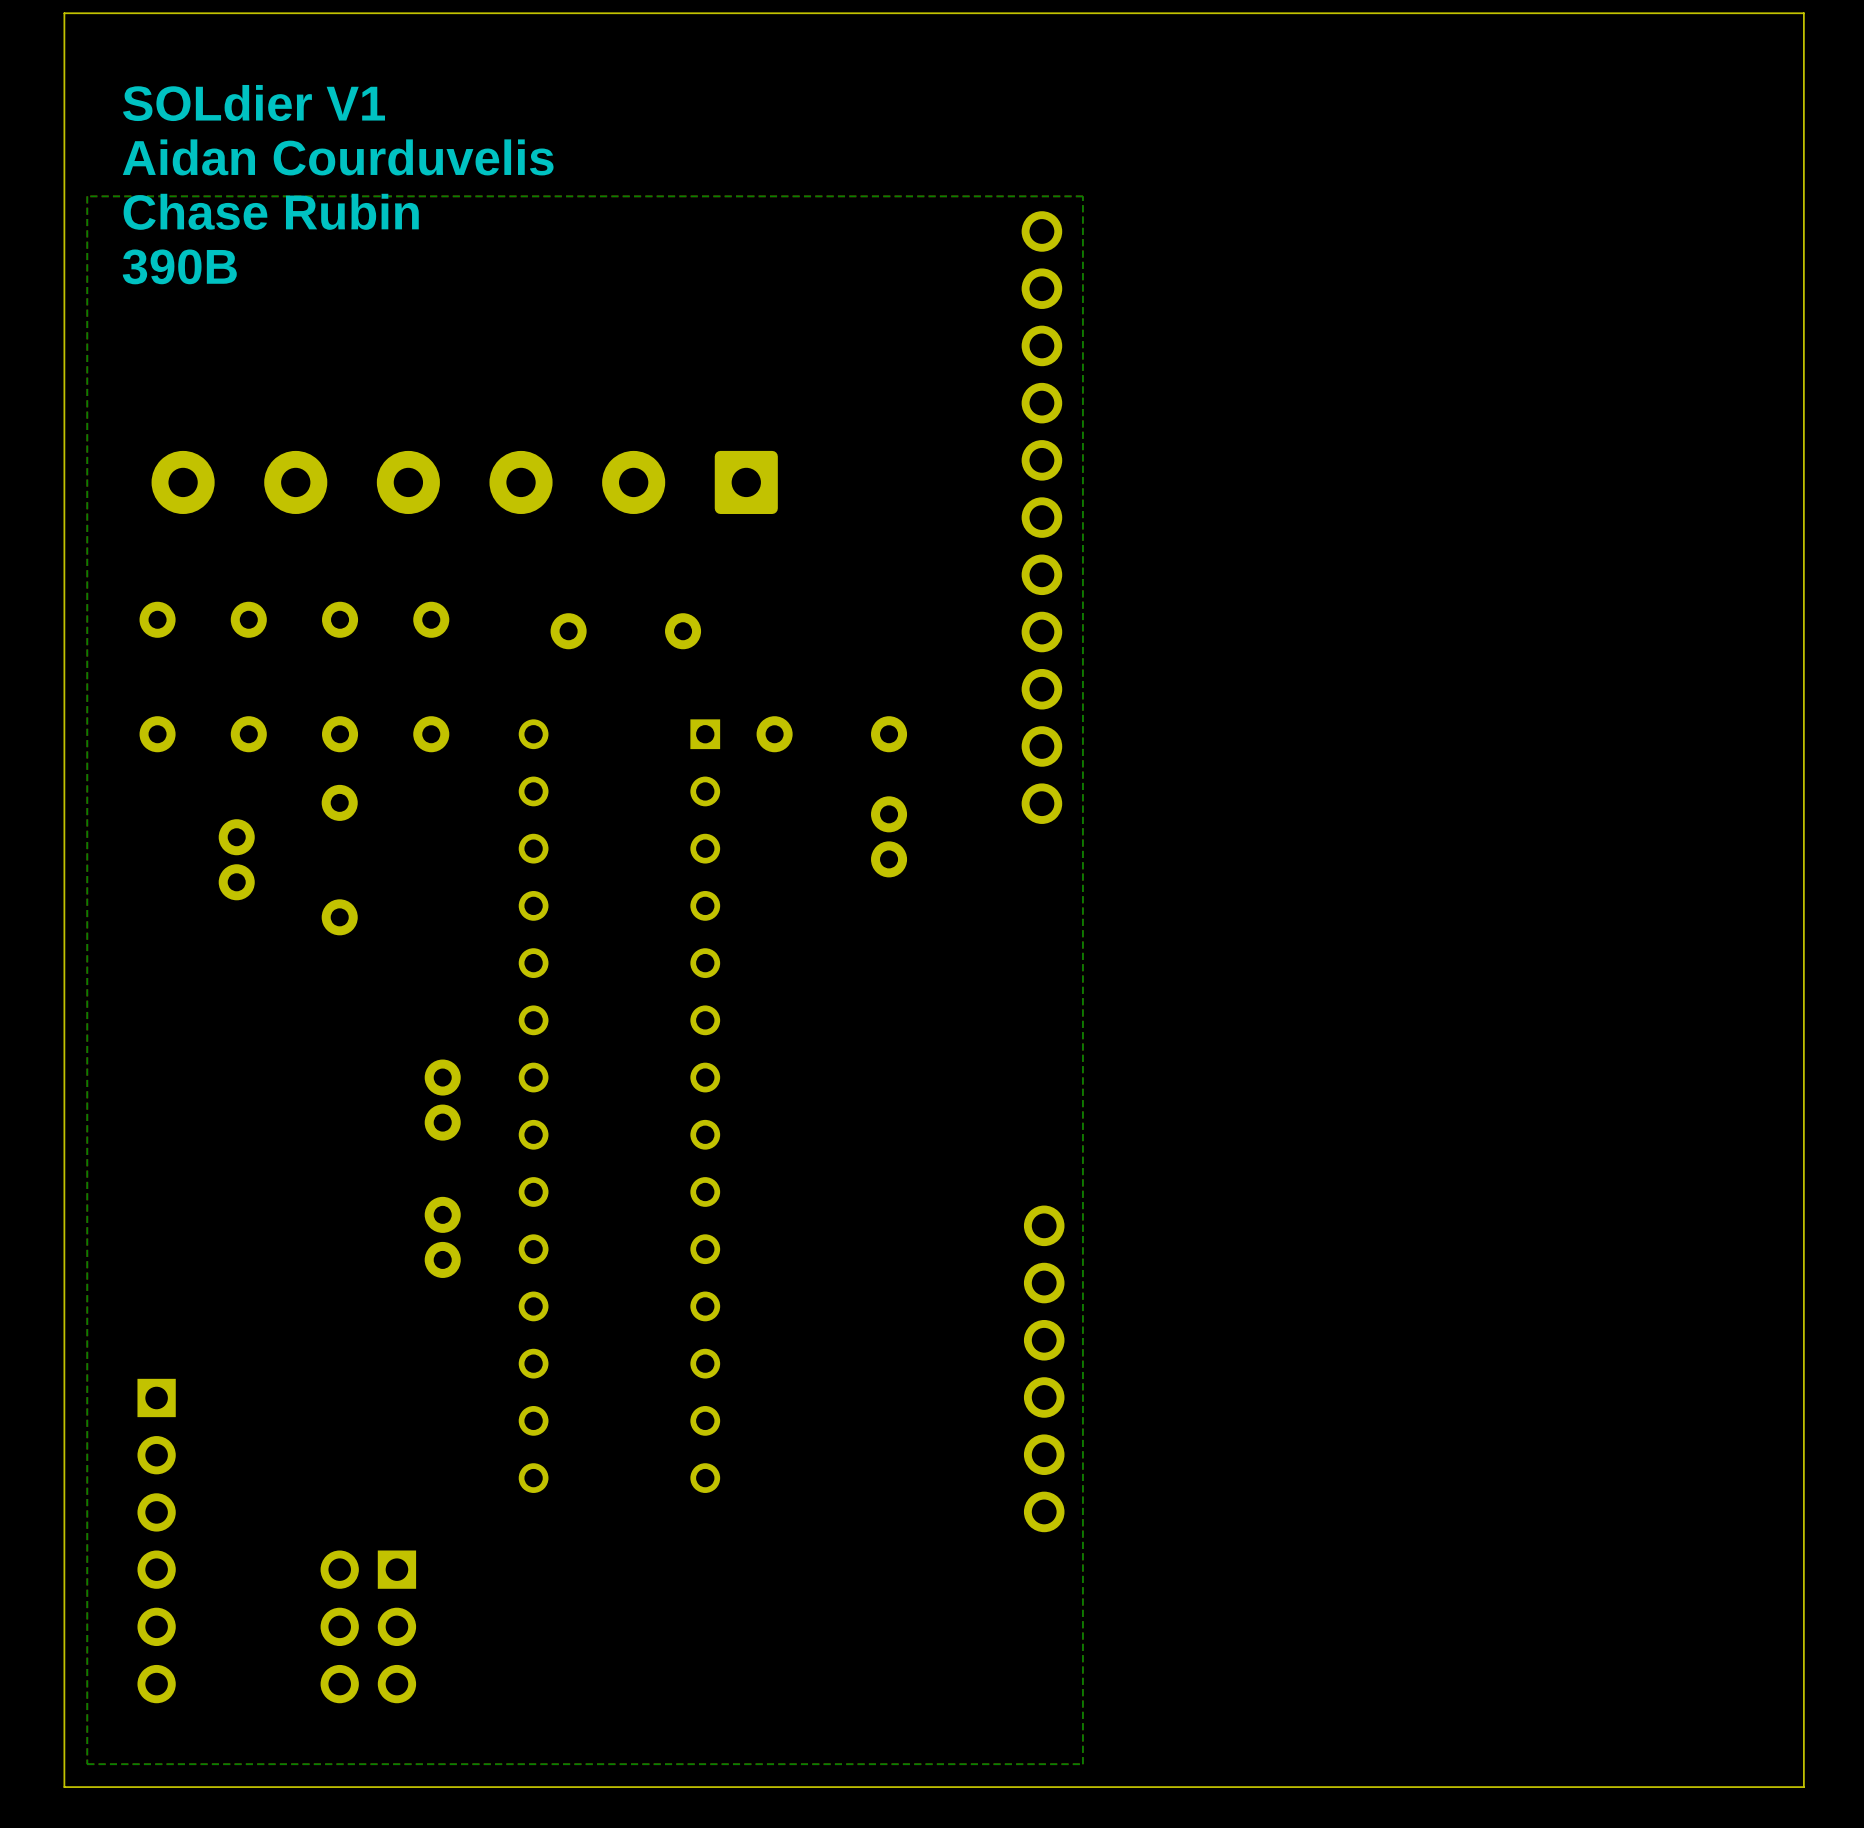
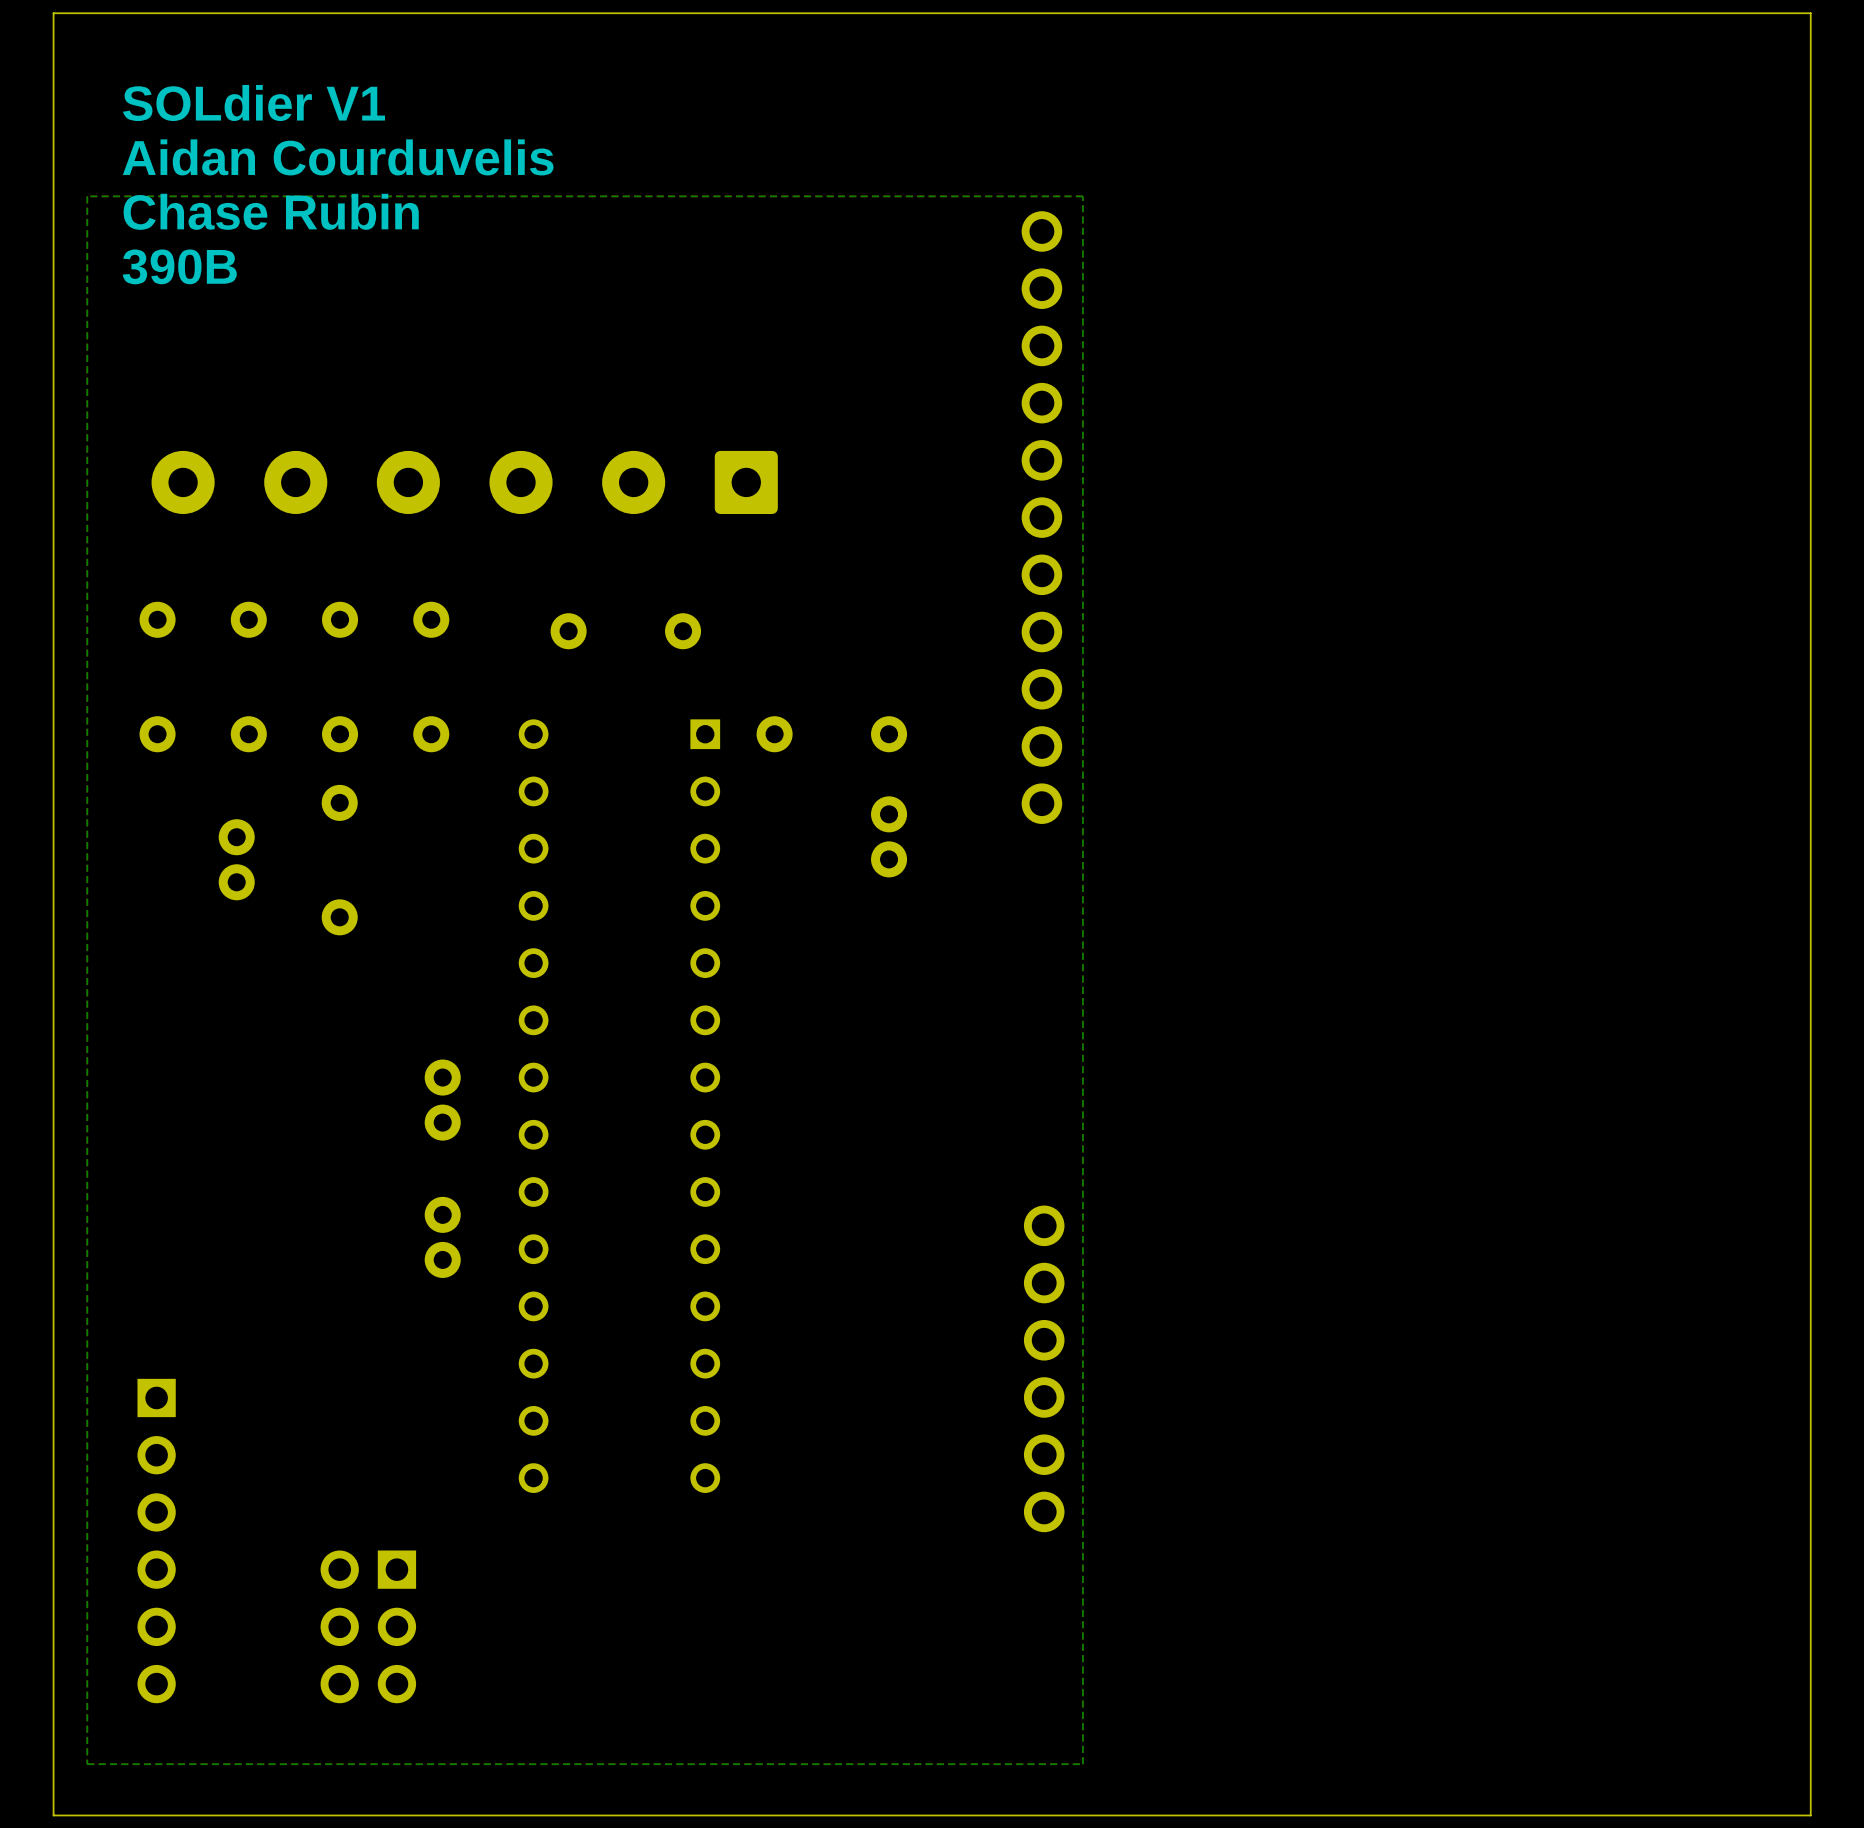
board edge: (1803, 13) (1803, 1787) (64, 1787) (64, 13) -> (1803, 13) (1810, 13) (1810, 1815) (53, 1815) (53, 13) (64, 13)

